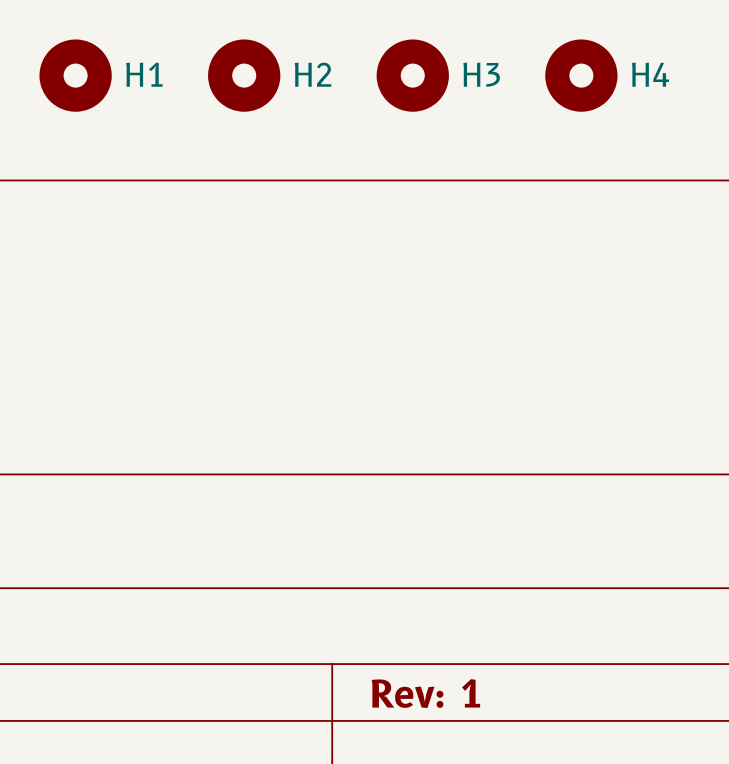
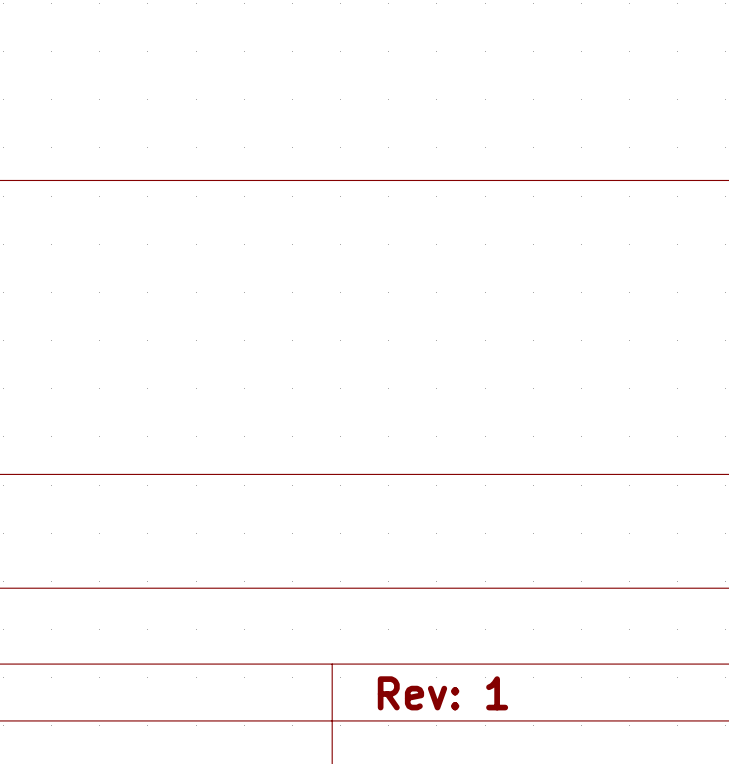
H1: (75, 75) -> none
H2: (244, 75) -> none
H3: (412, 75) -> none
H4: (581, 75) -> none

